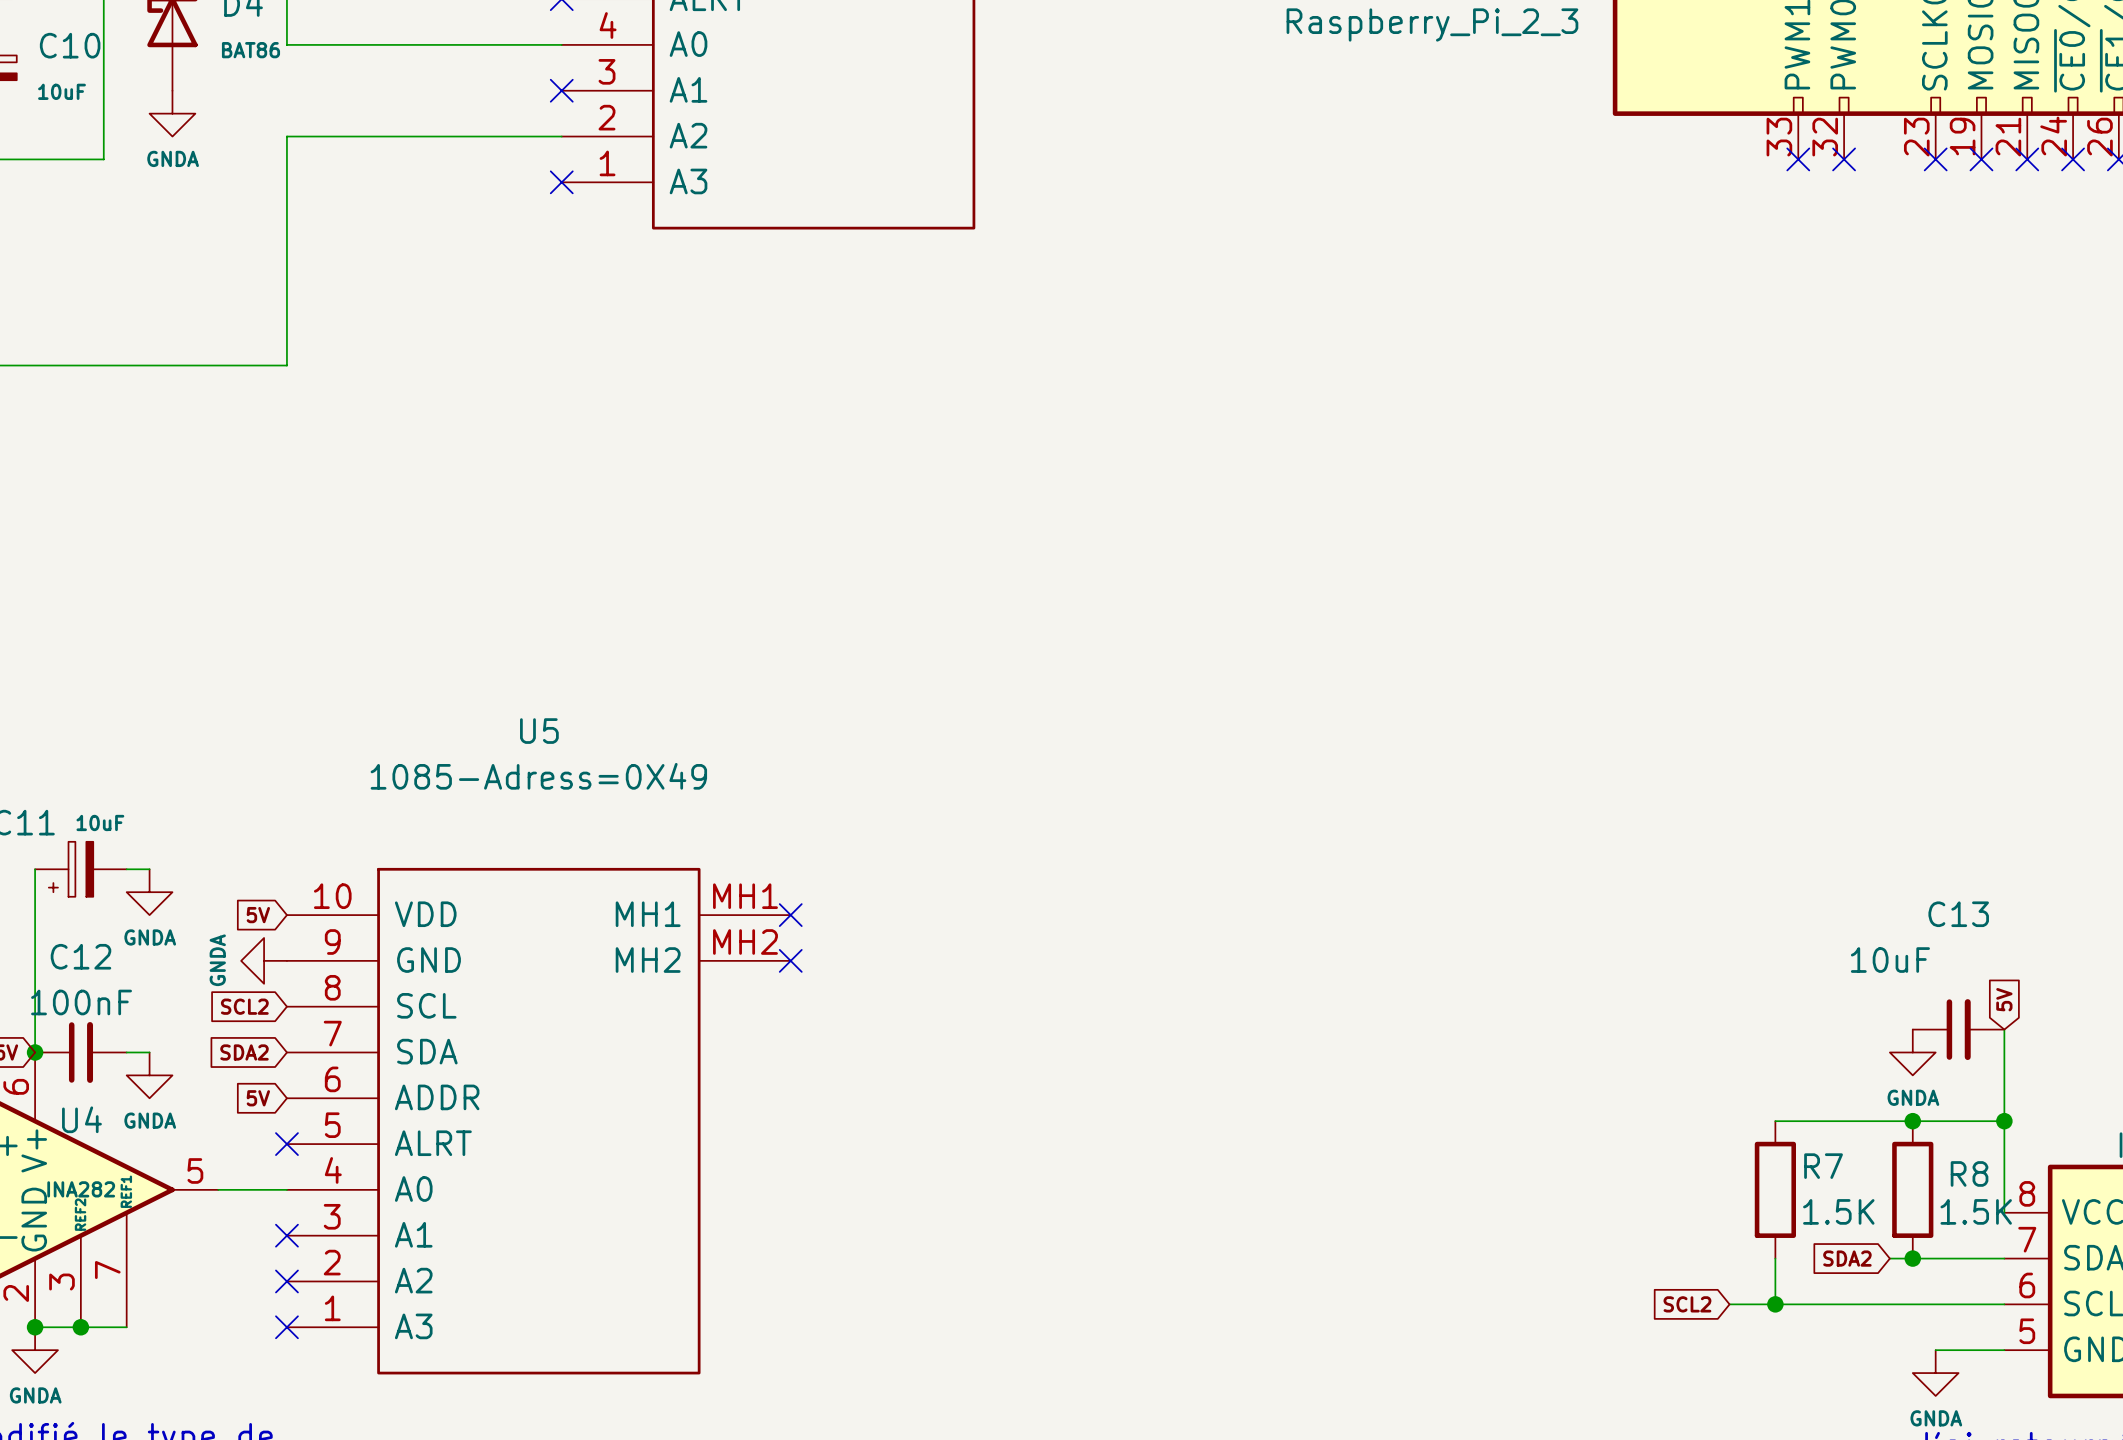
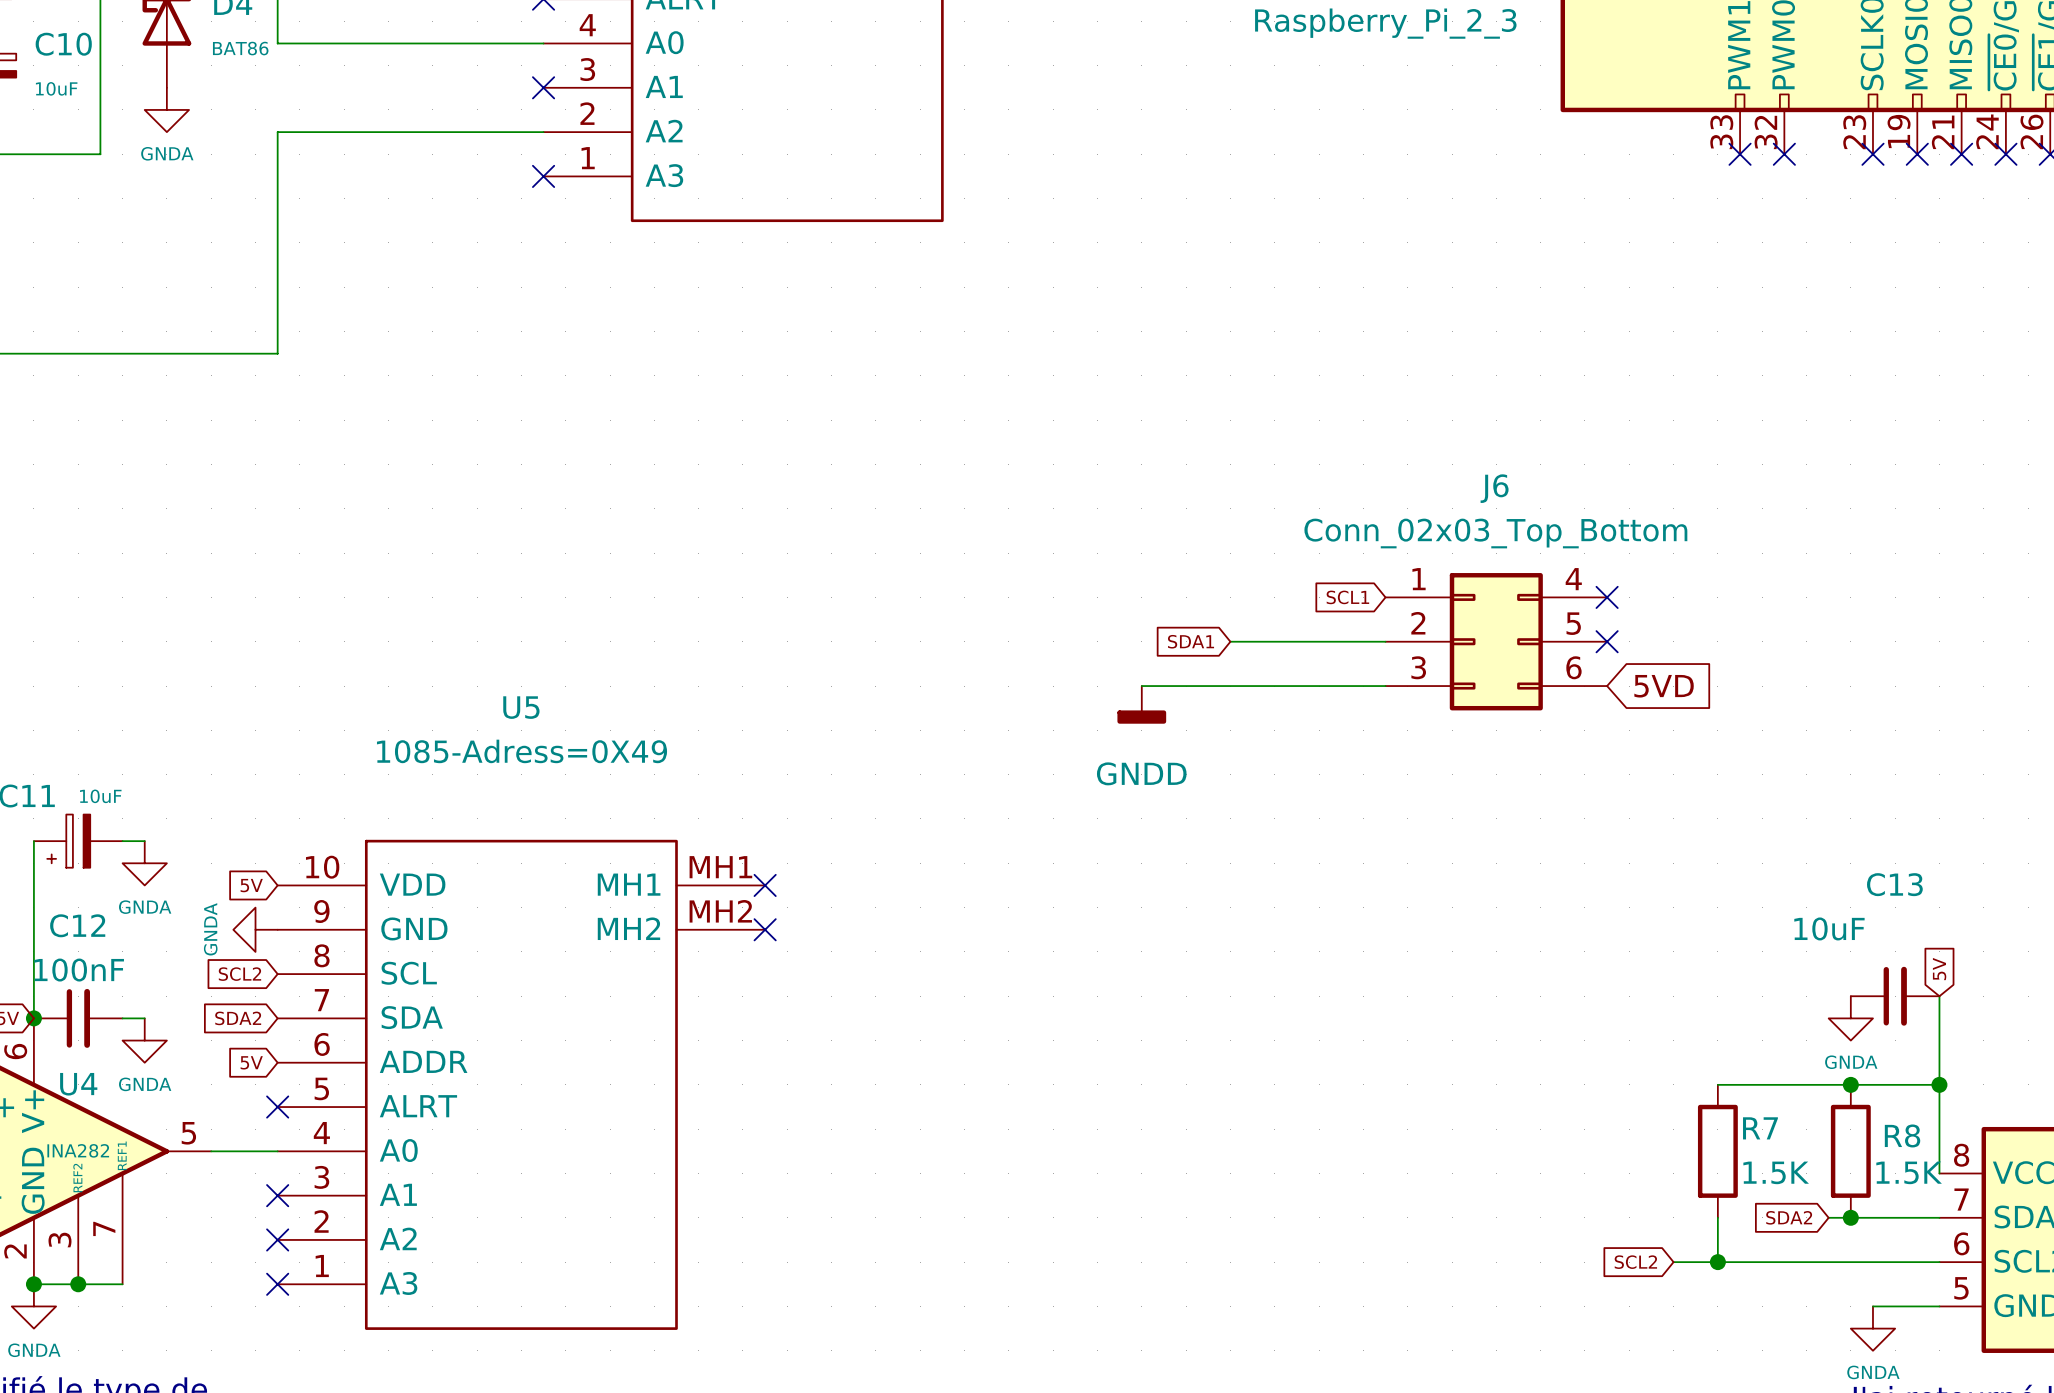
global label: none -> SCL1 (1347, 597)
no-connect mark: none -> (1607, 597)
global label: none -> SDA1 (1191, 641)
wire: none -> (1230, 641) (1385, 641)
J6: none -> Conn_02x03_Top_Bottom (1496, 641)
no-connect mark: none -> (1607, 641)
wire: none -> (1141, 686) (1385, 686)
global label: none -> 5VD (1664, 686)
power symbol: none -> GNDD (1141, 704)

